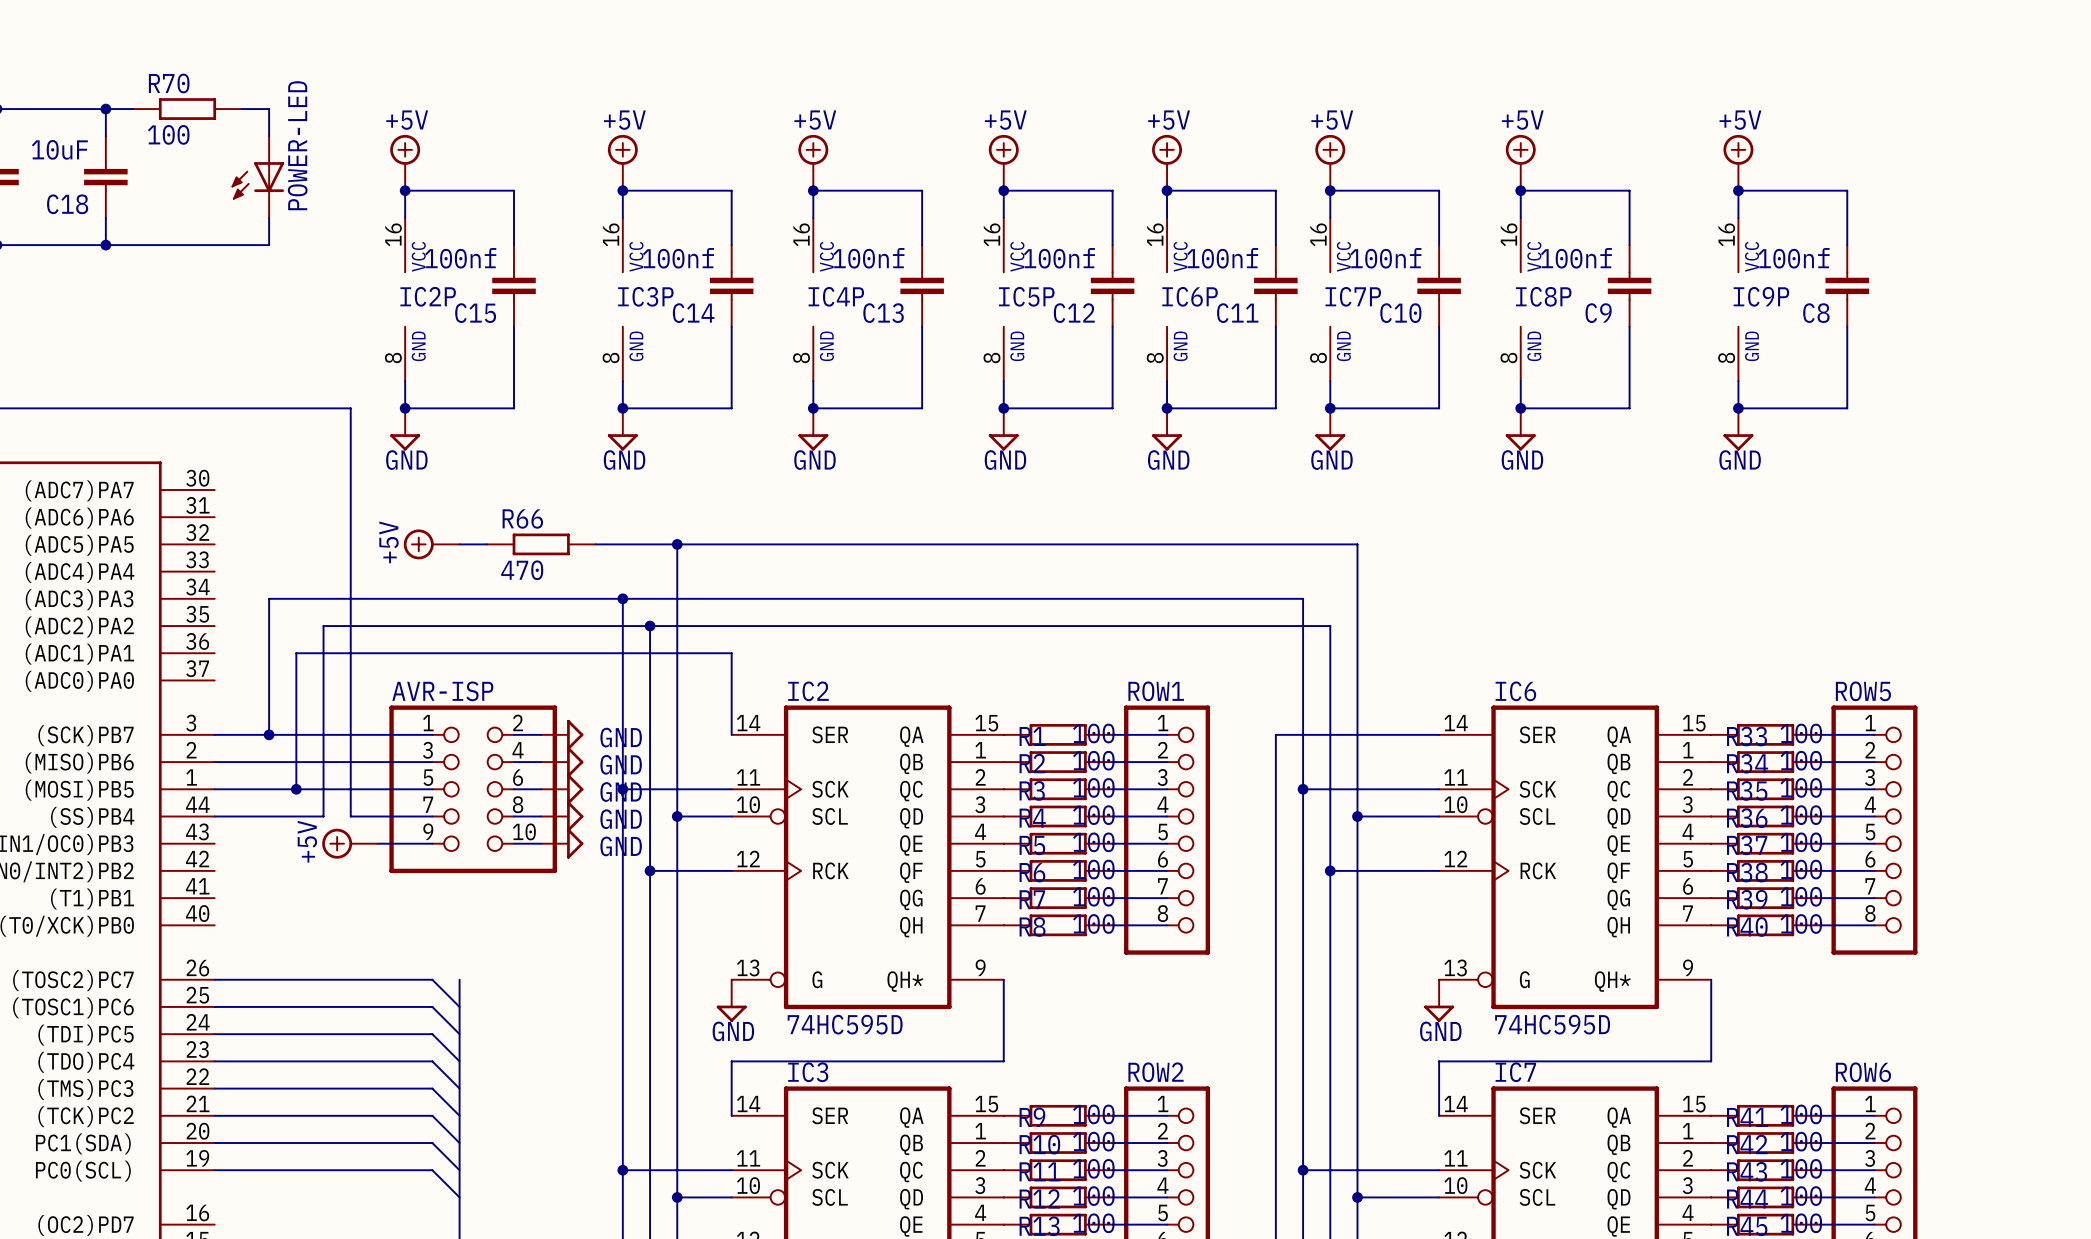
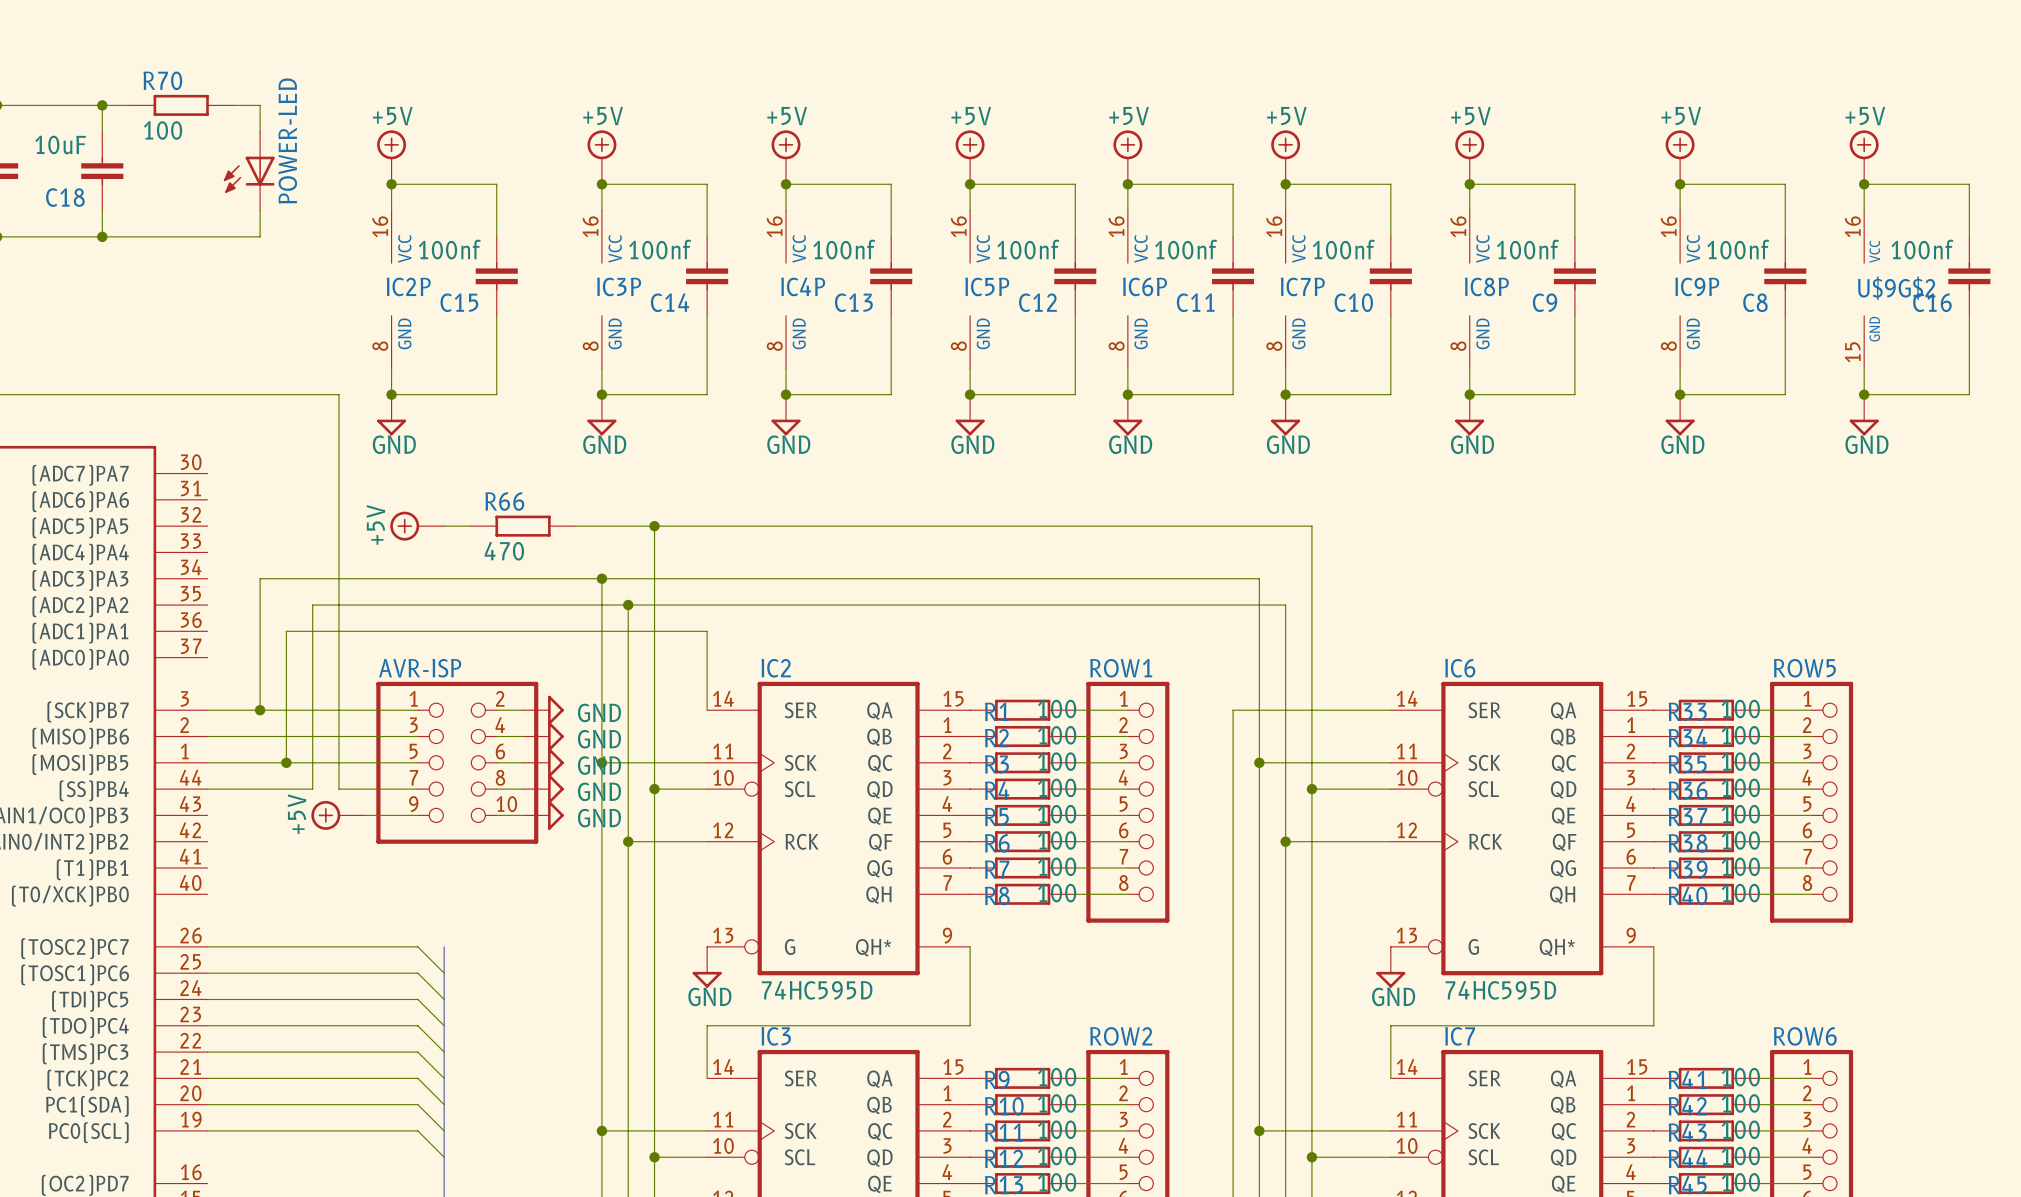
power symbol: none -> +5V (1864, 157)
junction: none -> (1864, 184)
wire: none -> (1864, 210) (1864, 184) (1969, 184) (1969, 236)
C16: none -> 100nf (1969, 276)
U$9G$2: none -> (1864, 289)
wire: none -> (1969, 315) (1969, 394) (1864, 394) (1864, 368)
junction: none -> (1864, 394)
power symbol: none -> GND (1864, 415)

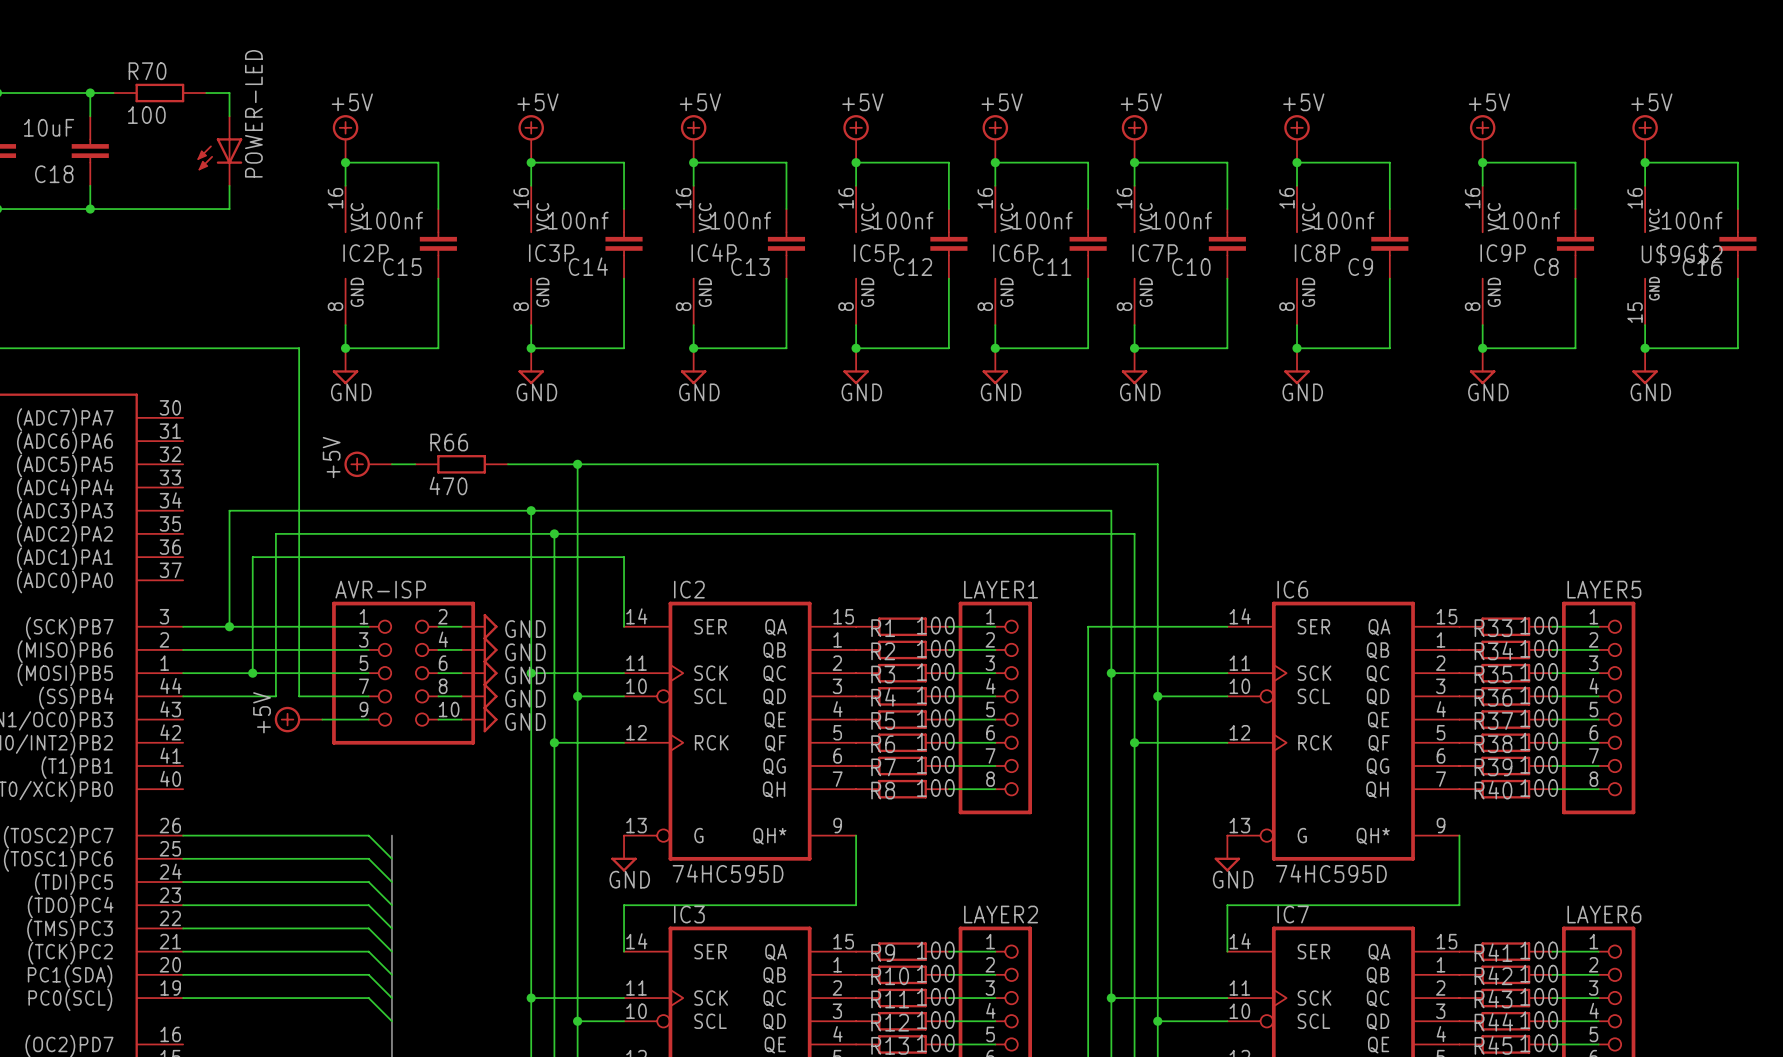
ROW1 name: ROW1 (1121, 668) -> LAYER1 (1001, 589)
ROW5 name: ROW5 (1804, 668) -> LAYER5 (1604, 589)
ROW2 name: ROW2 (1121, 1036) -> LAYER2 (1001, 914)
ROW6 name: ROW6 (1805, 1036) -> LAYER6 (1604, 914)

